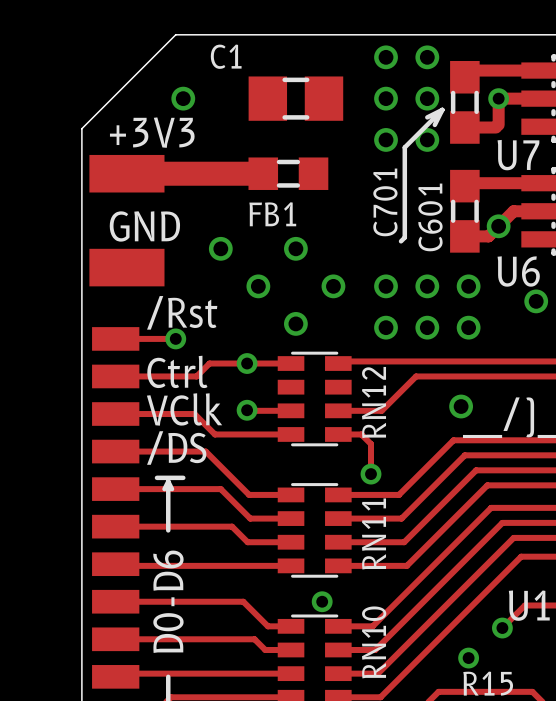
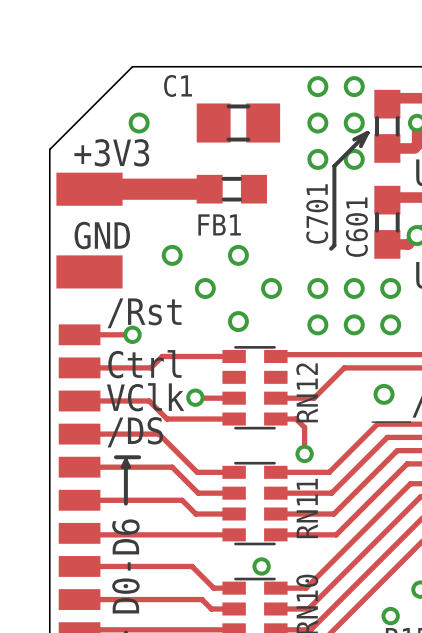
via: (247, 363) -> none

